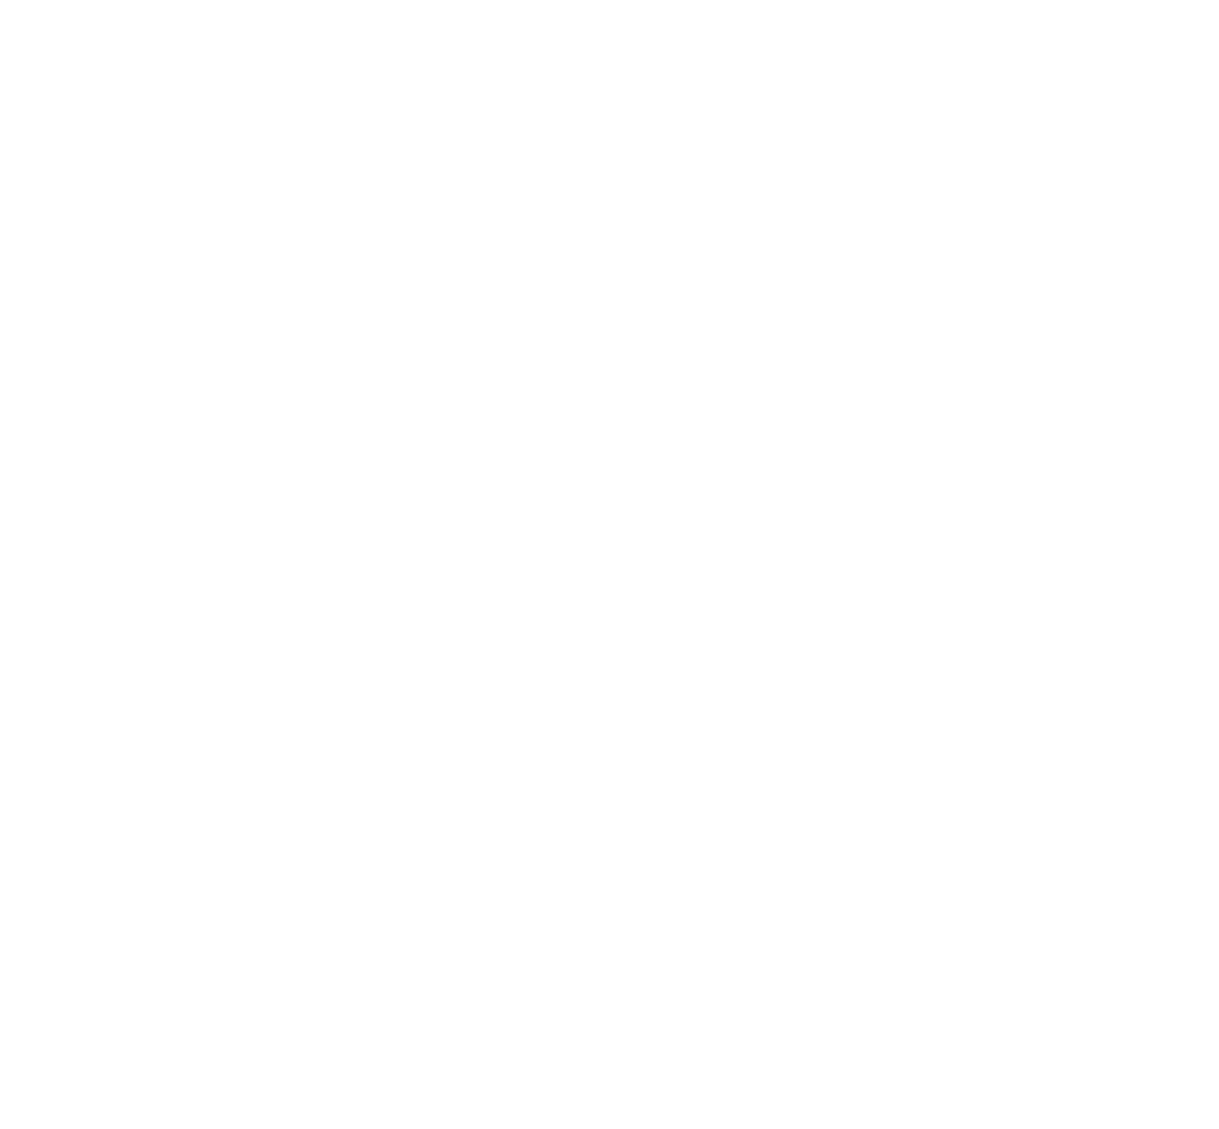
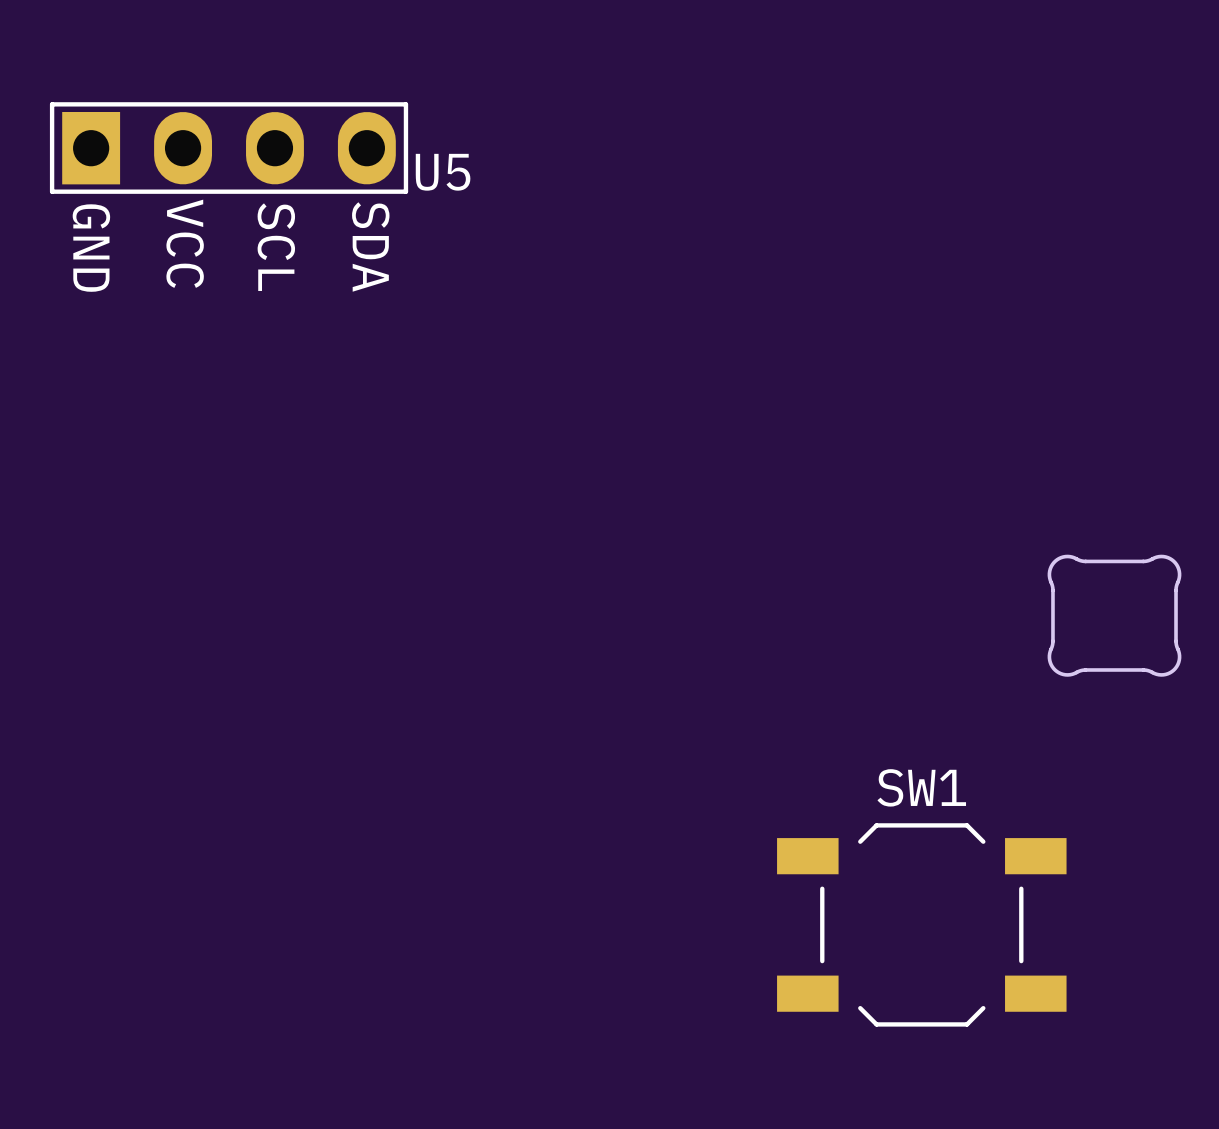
U5: none -> (229, 148)
part: none -> (1114, 615)
SW1: none -> (921, 924)

